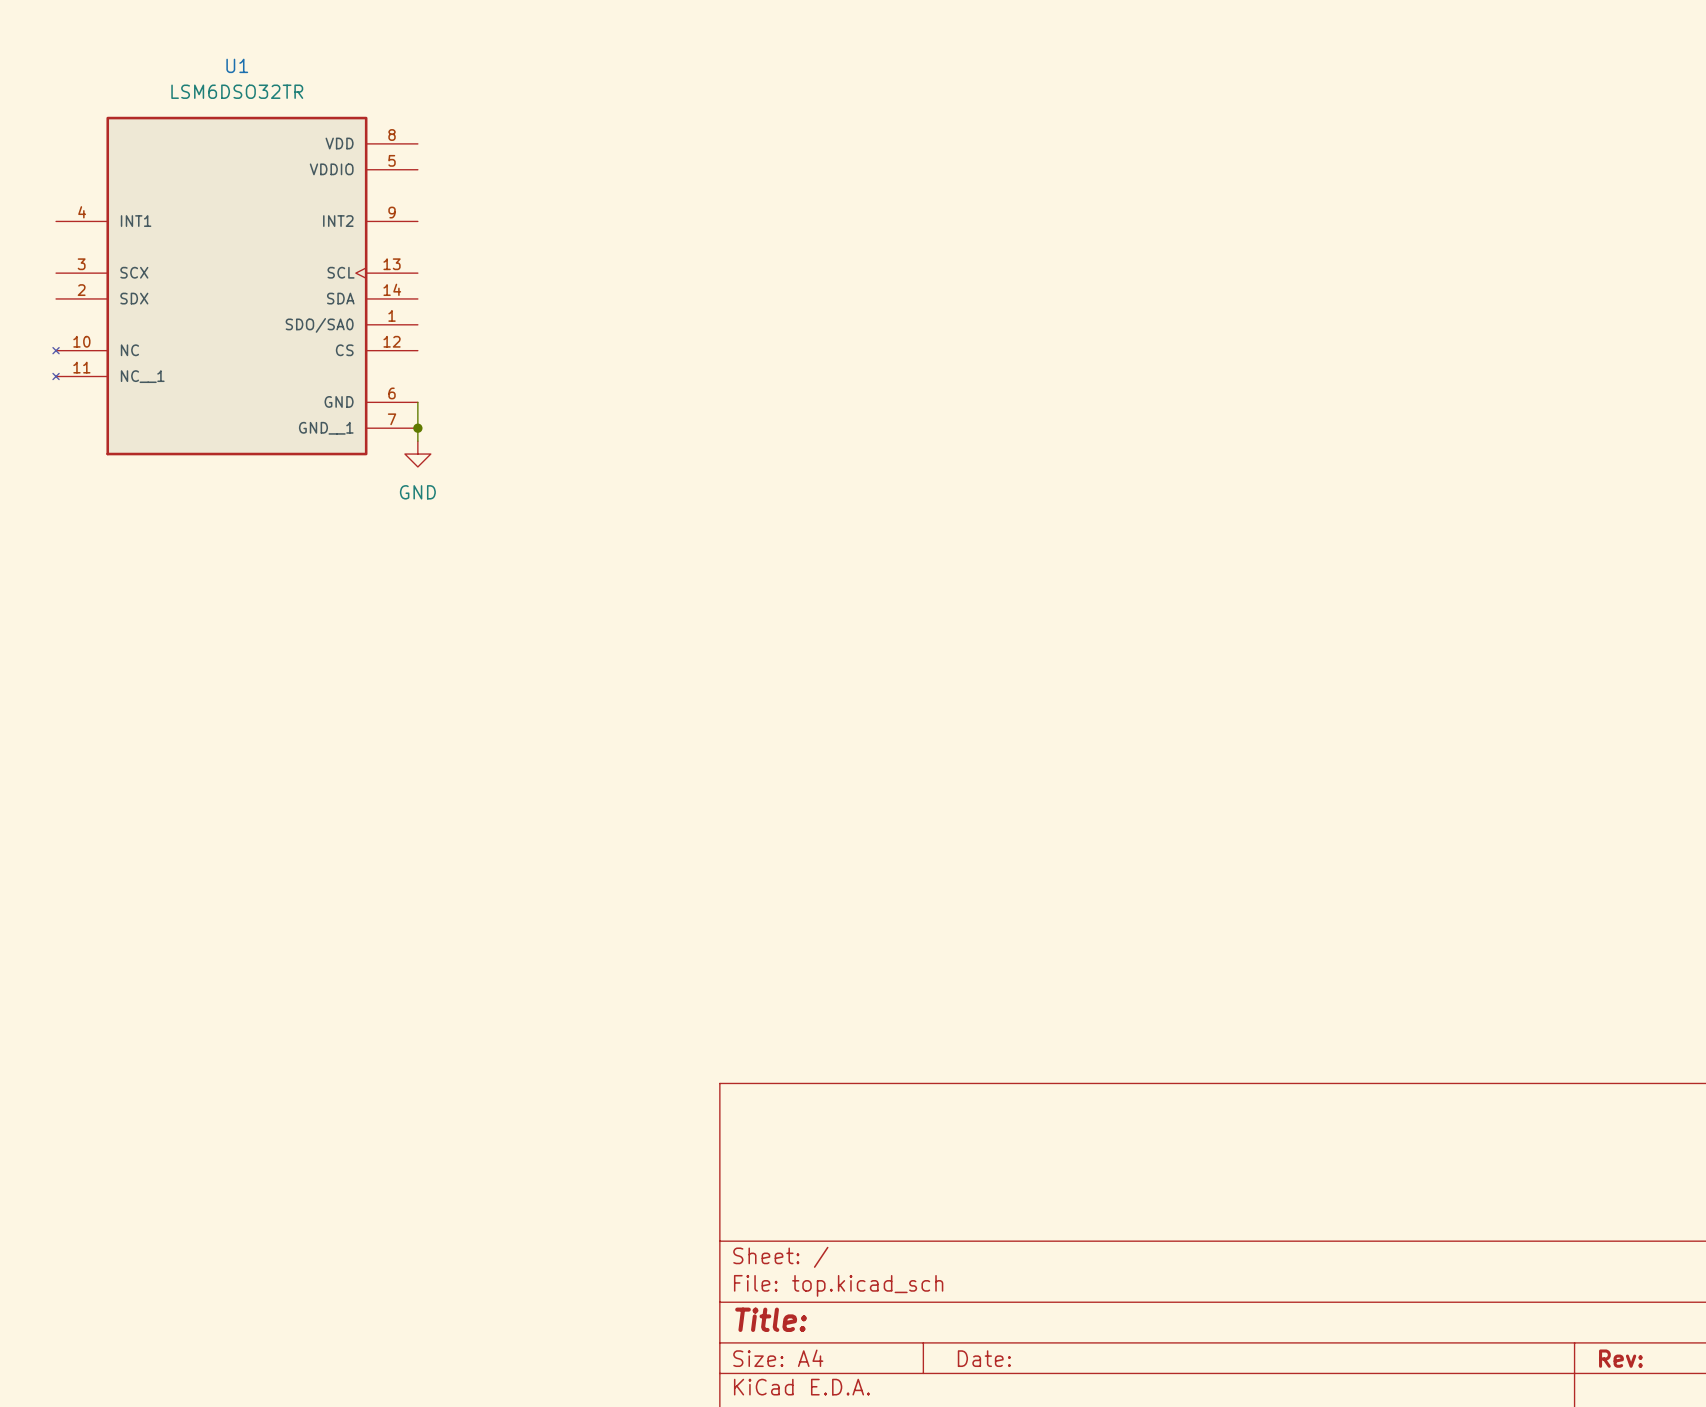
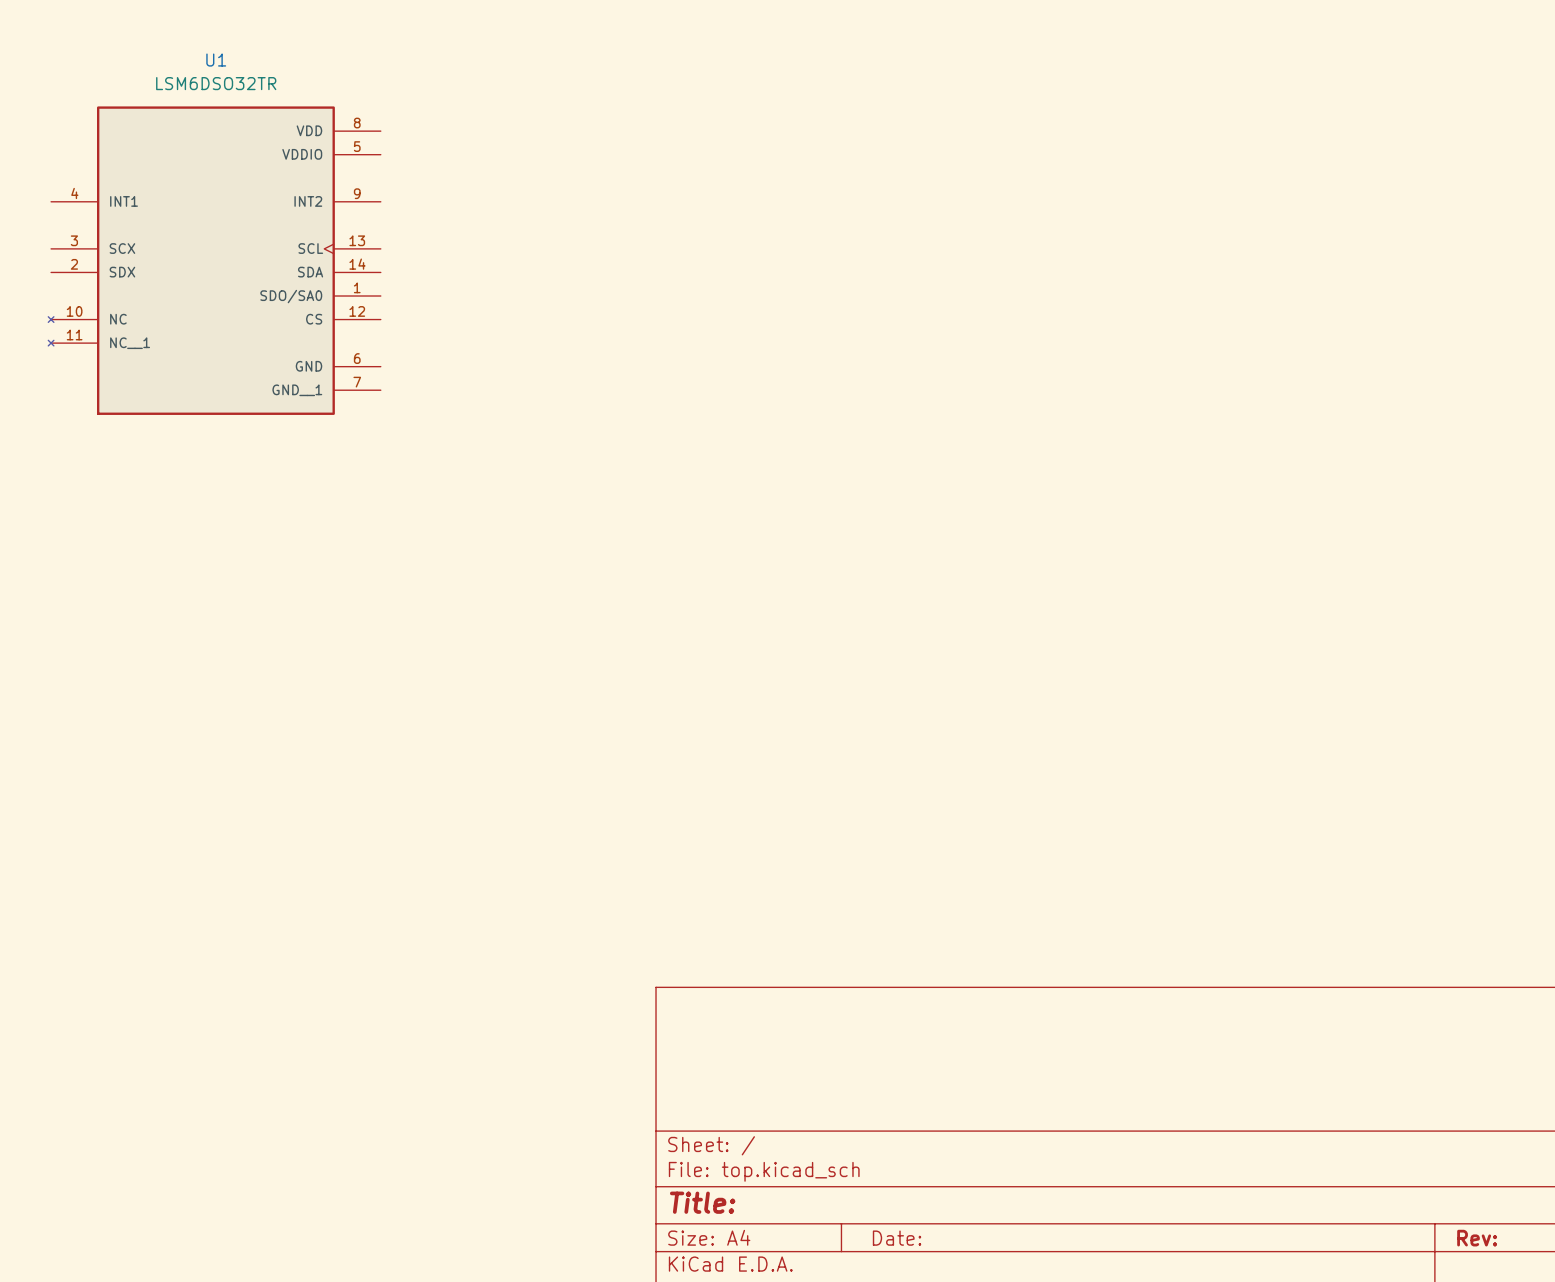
wire: (417, 402) (417, 441) -> none
junction: (417, 428) -> none
power symbol: GND (417, 454) -> none

